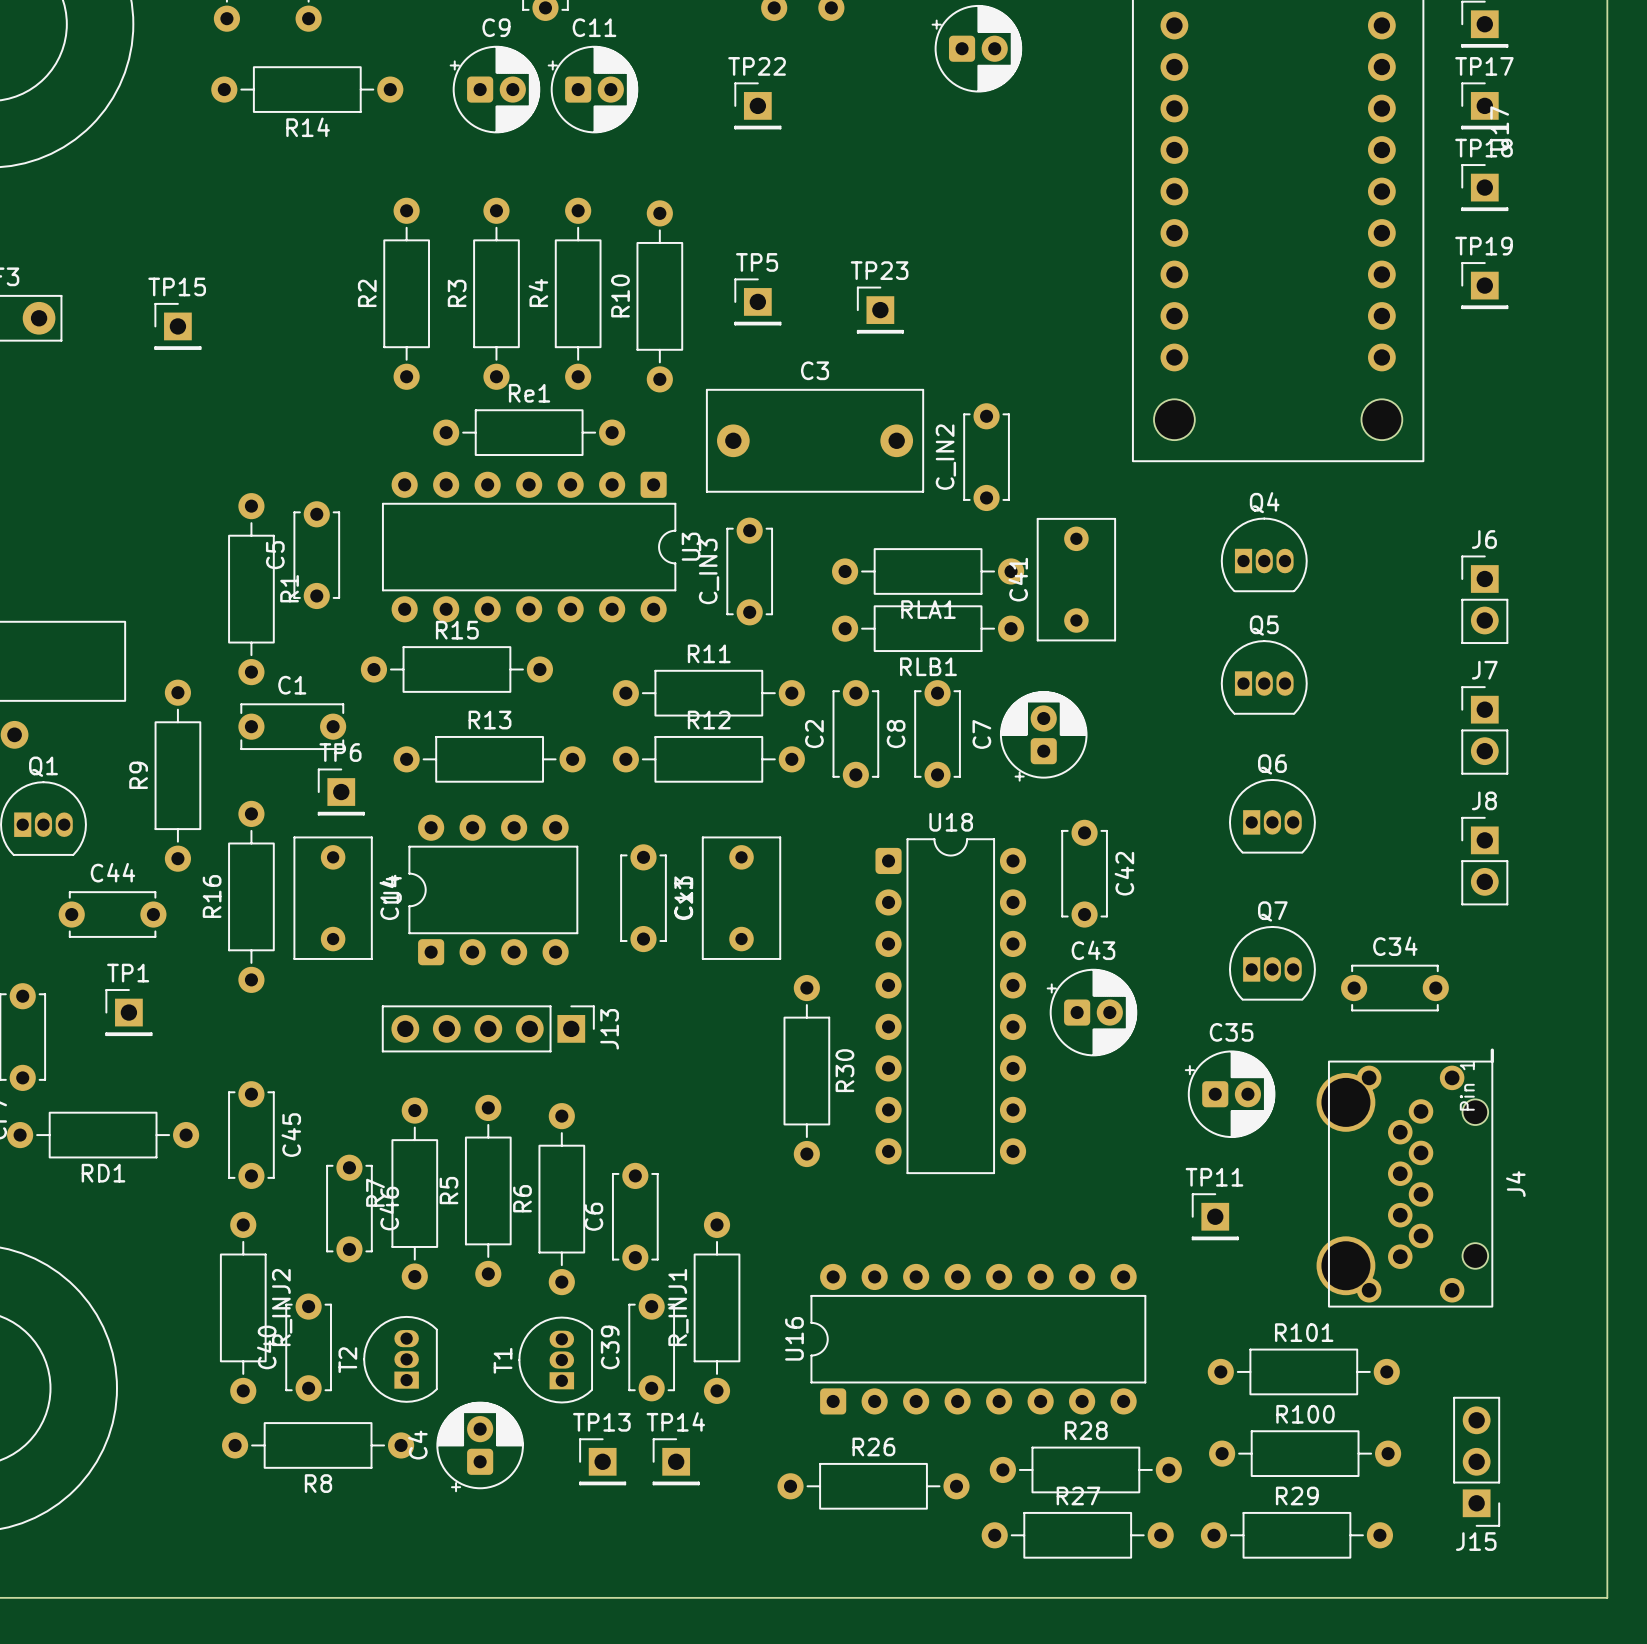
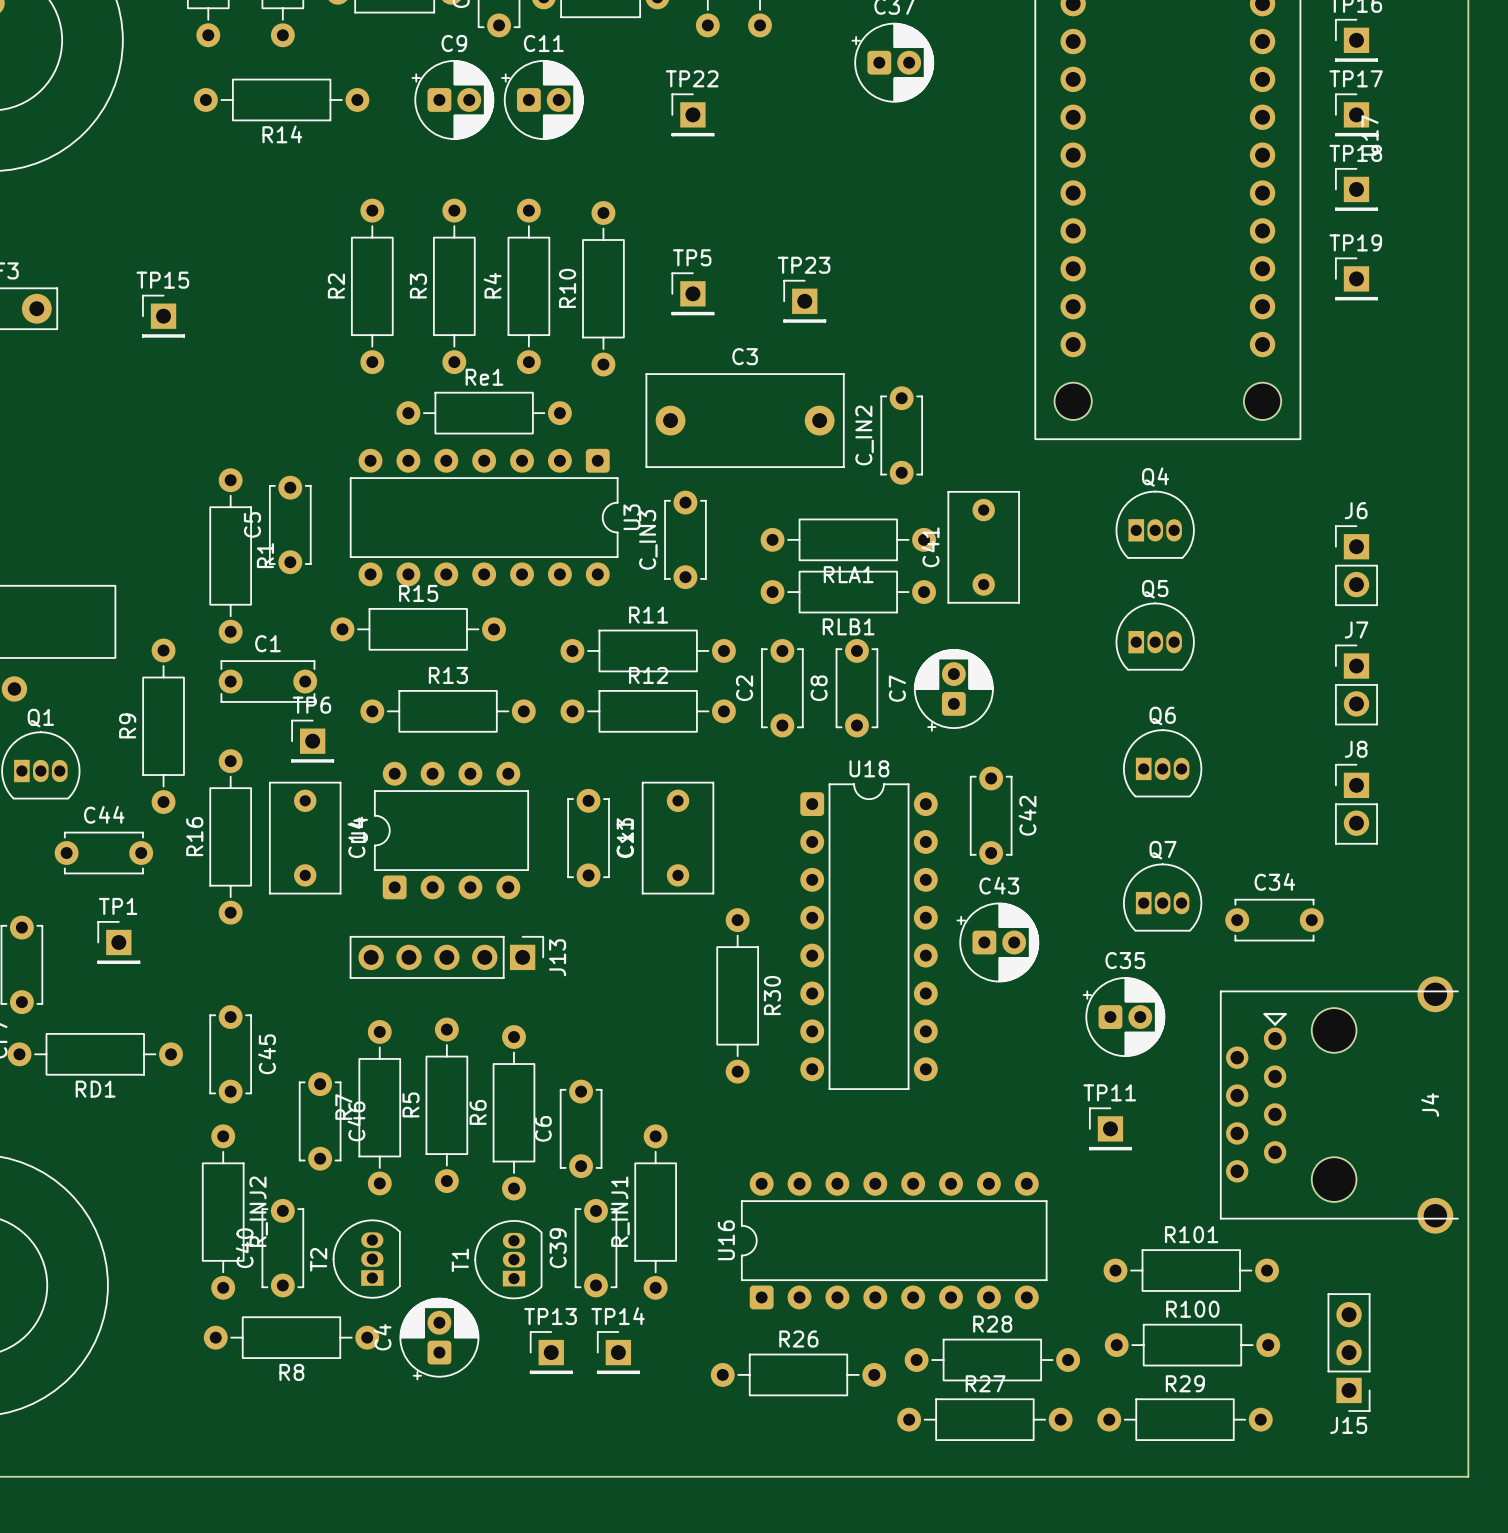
J4 footprint: [1316, 1048, 1494, 1308] -> [1219, 976, 1459, 1234]

